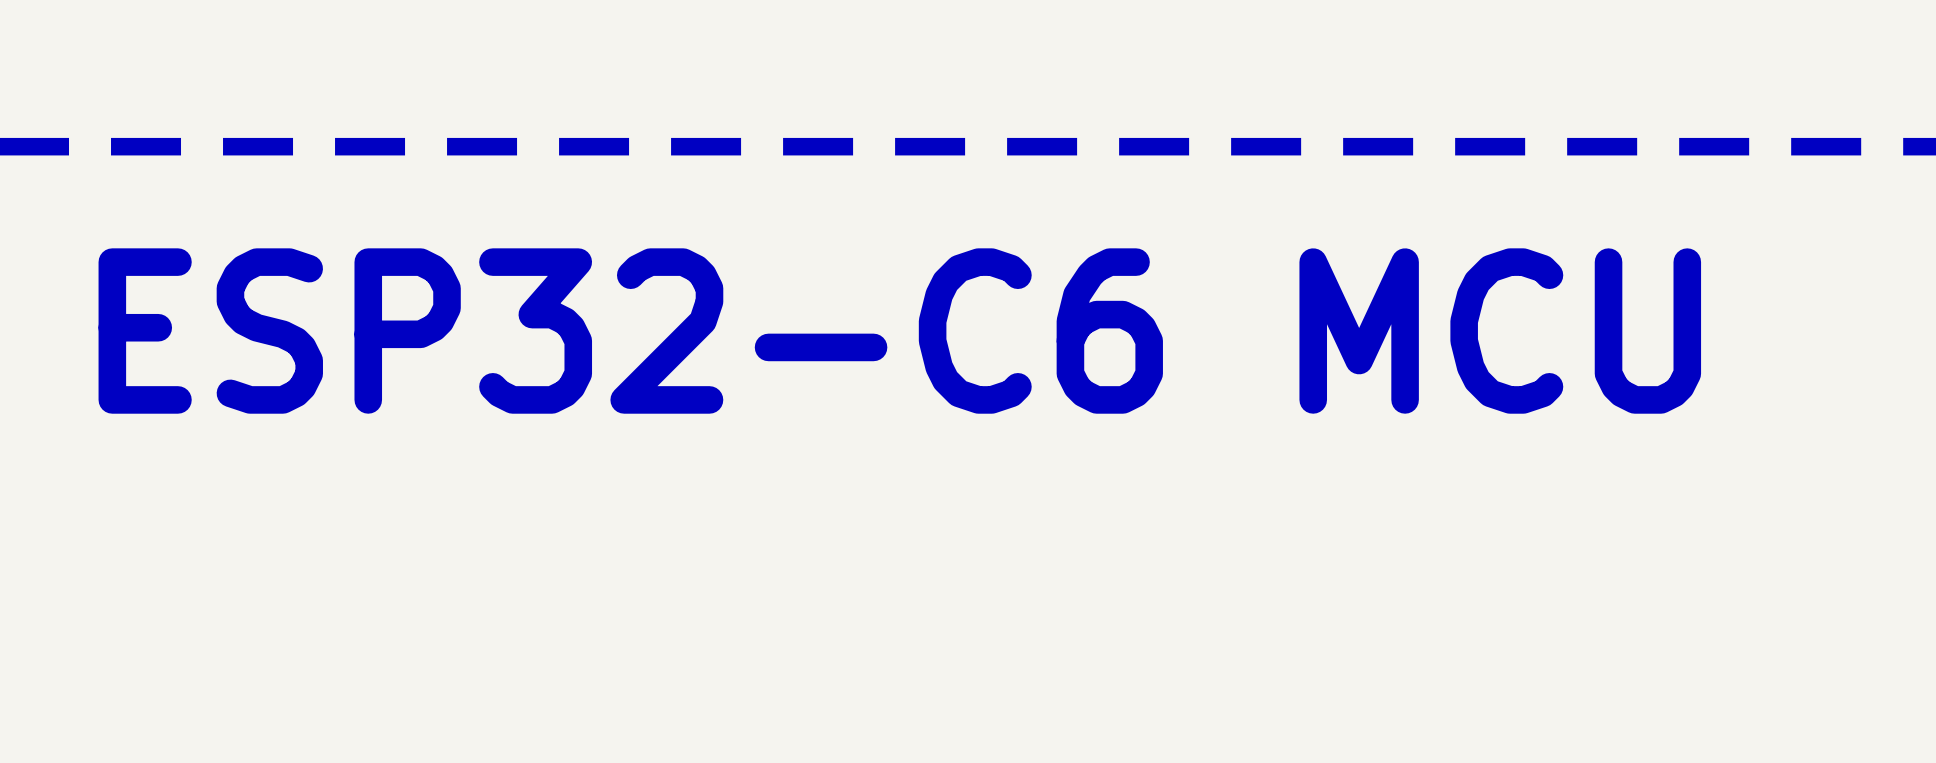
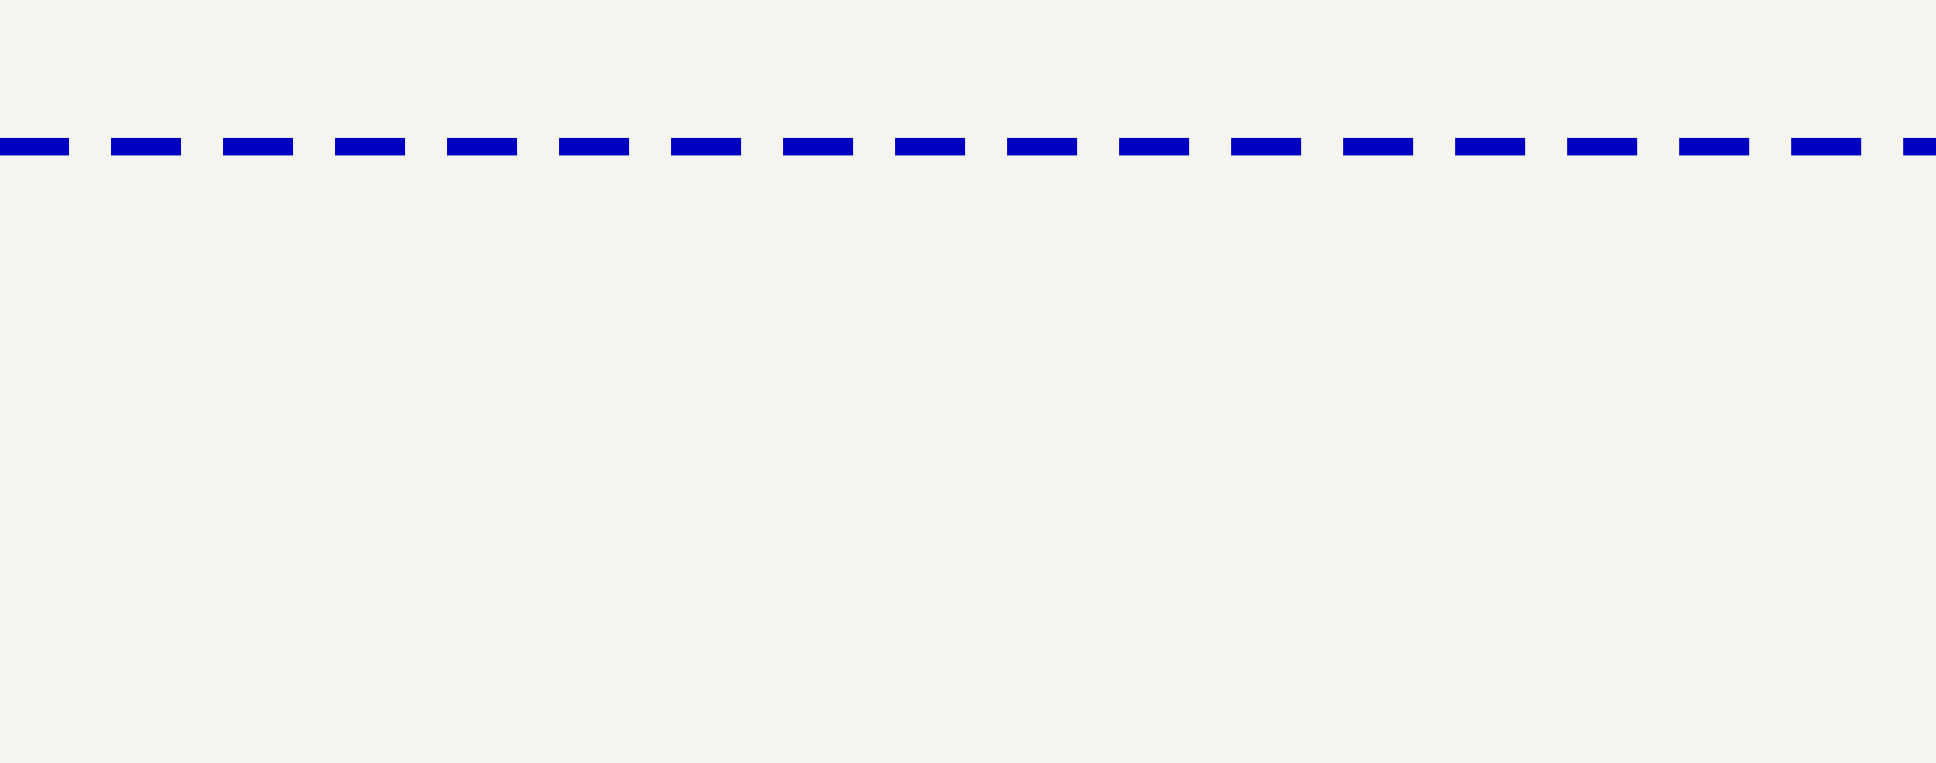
text: ESP32-C6 MCU (899, 331) -> none

